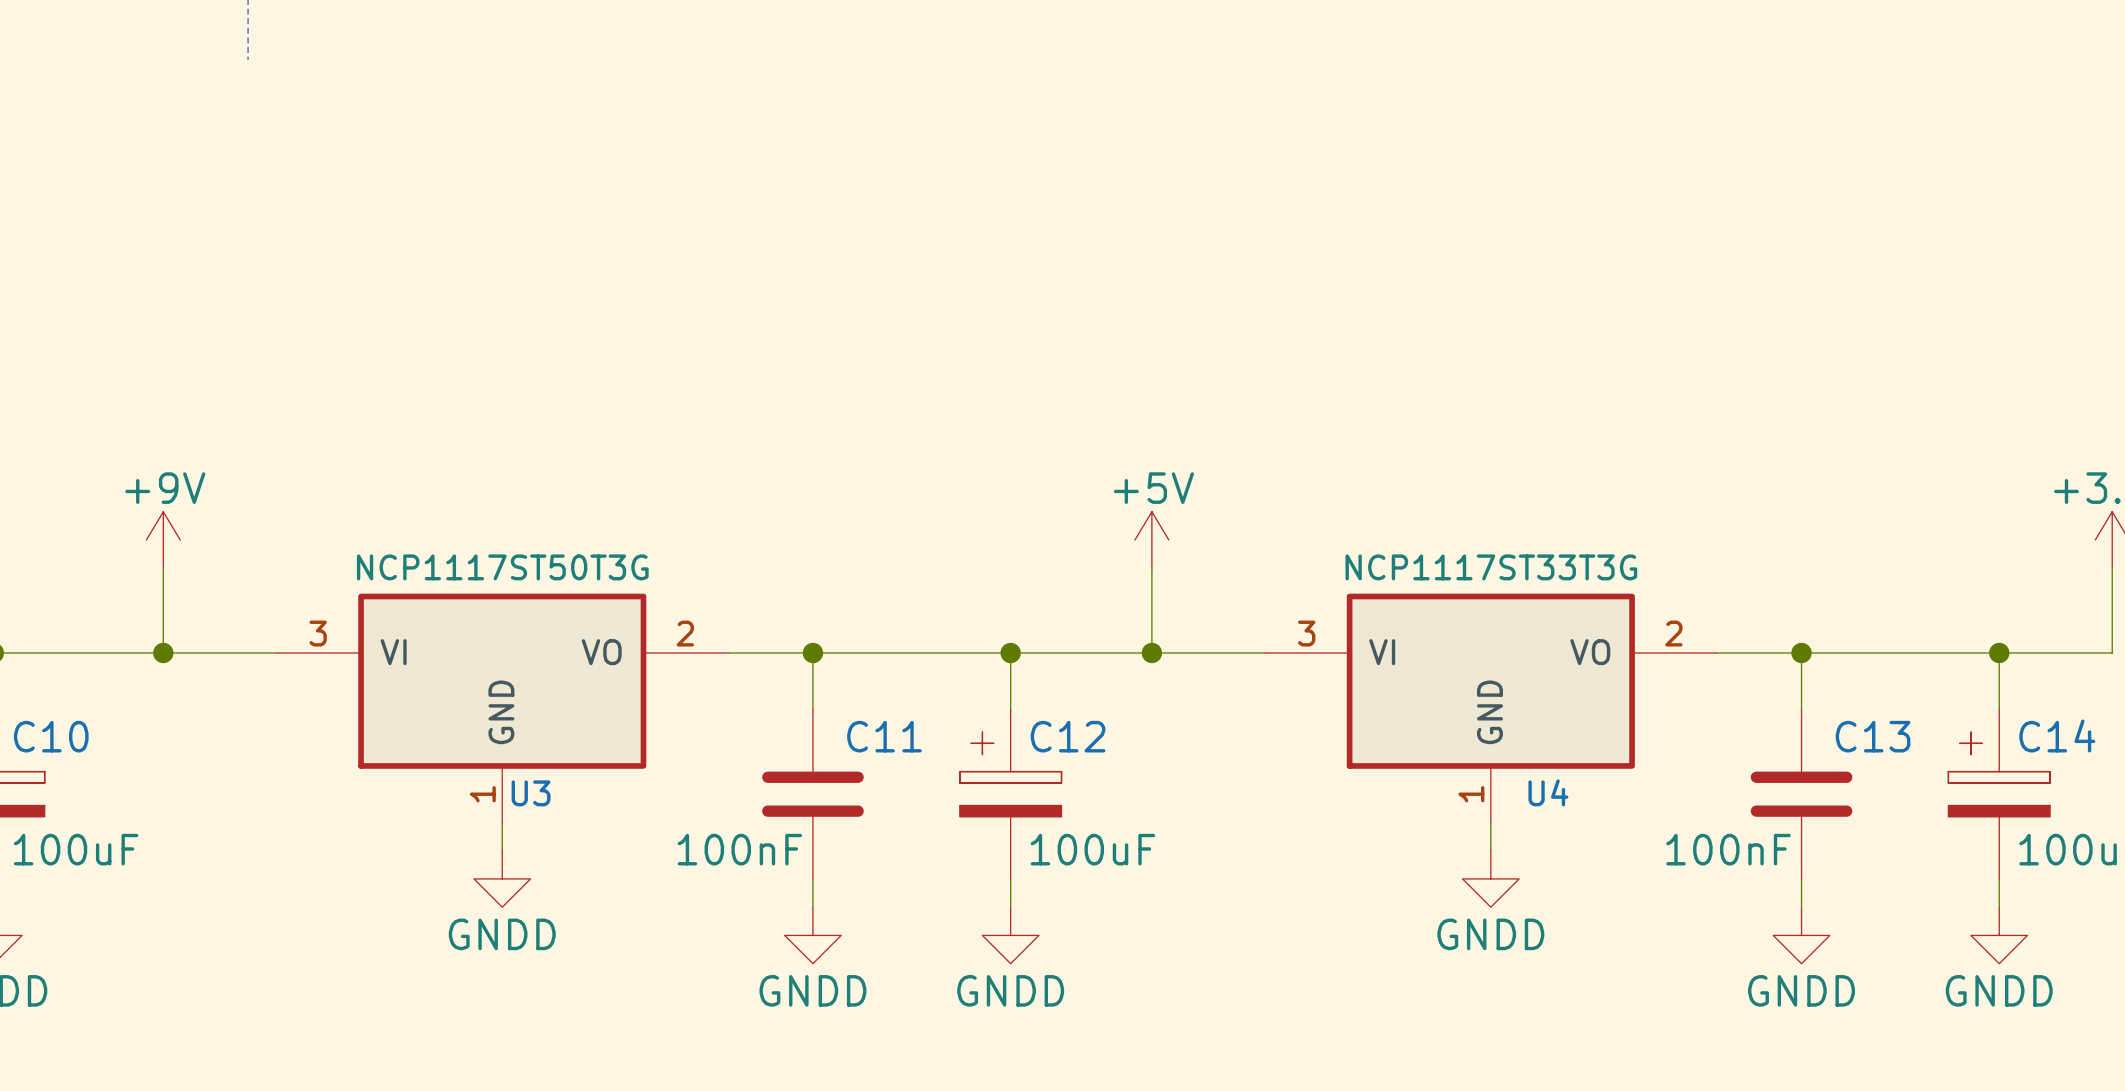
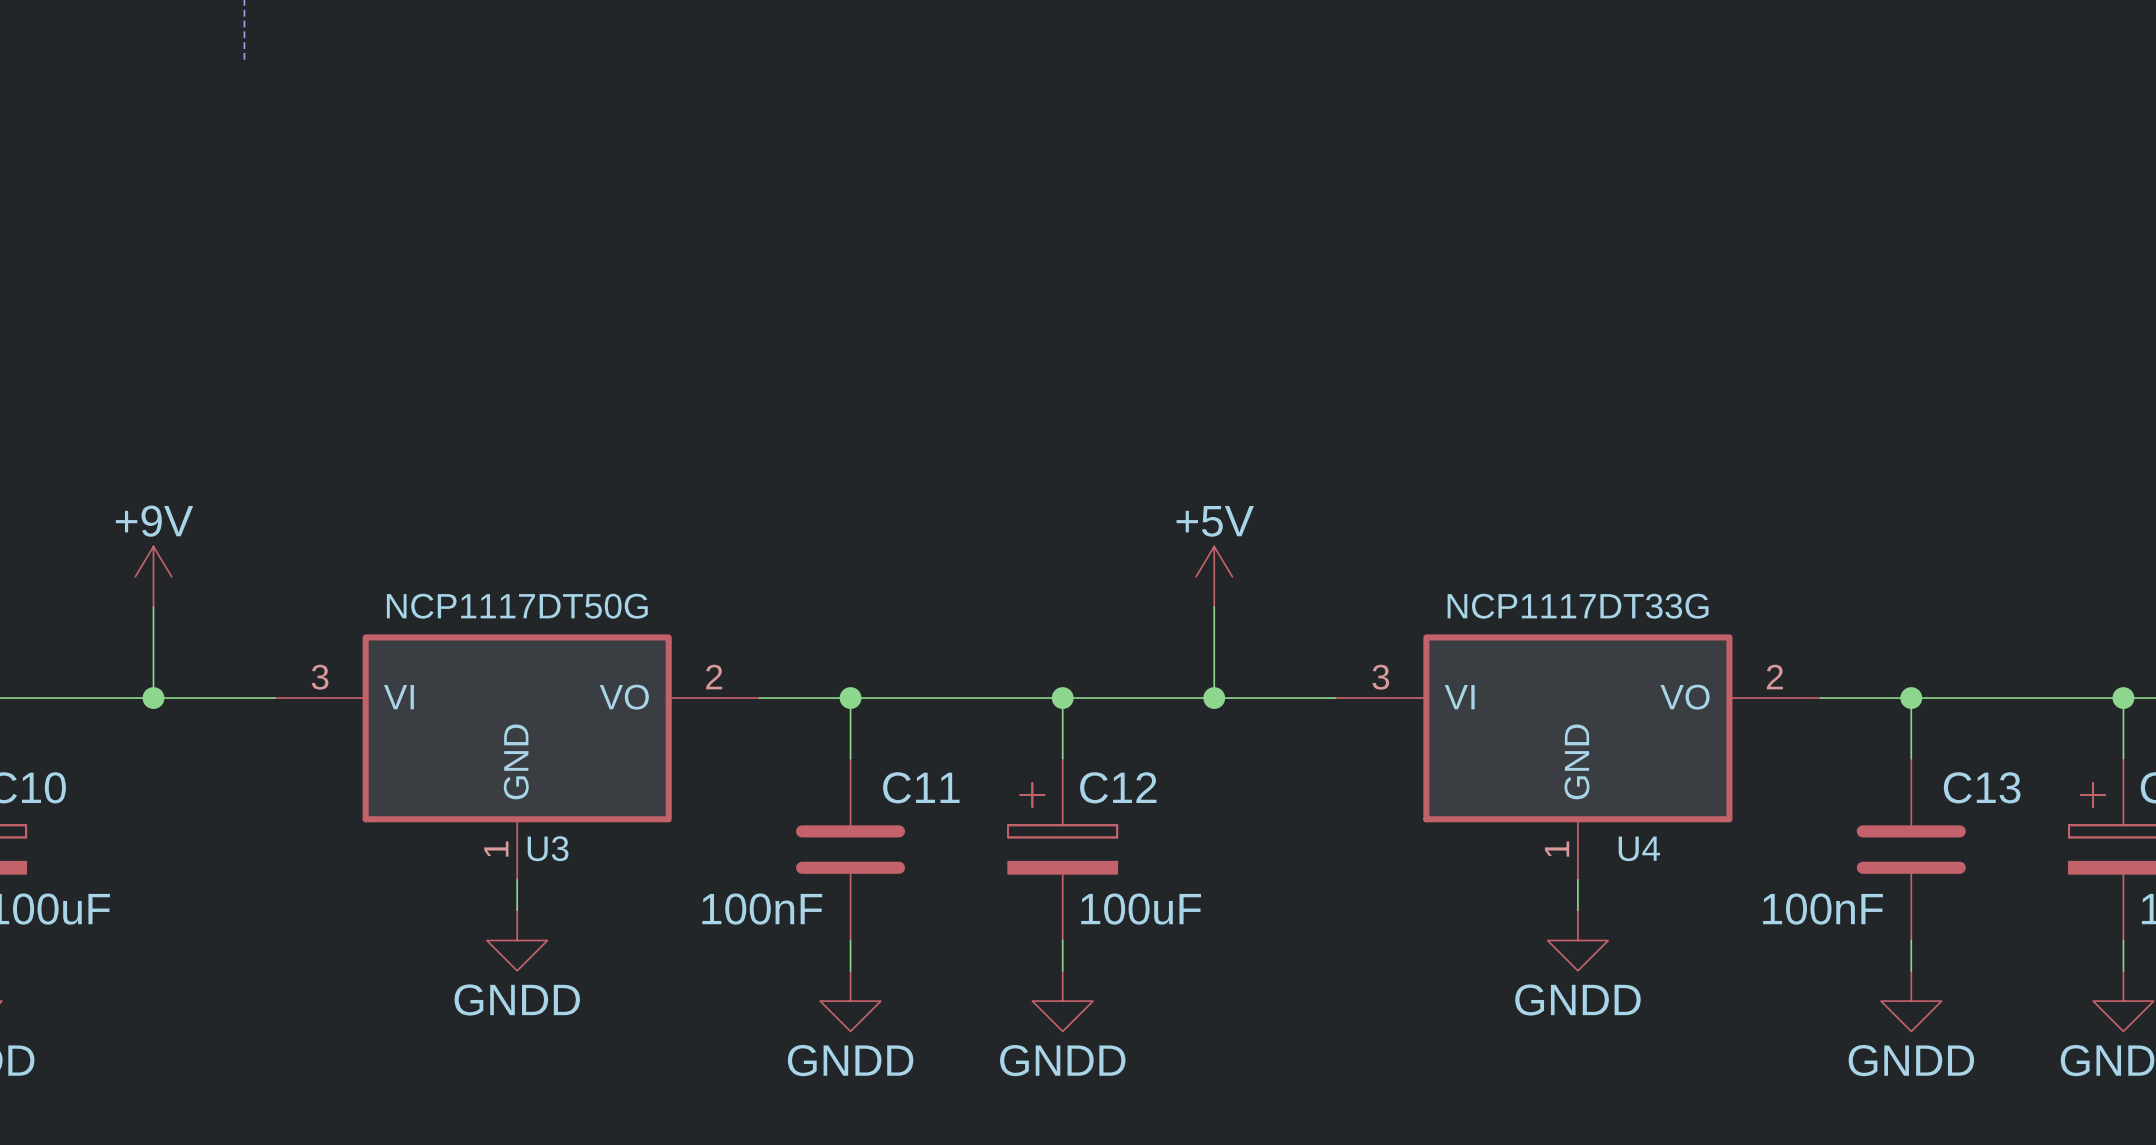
U3 value: NCP1117ST50T3G (502, 567) -> NCP1117DT50G (517, 606)
U4 value: NCP1117ST33T3G (1491, 567) -> NCP1117DT33G (1578, 606)

